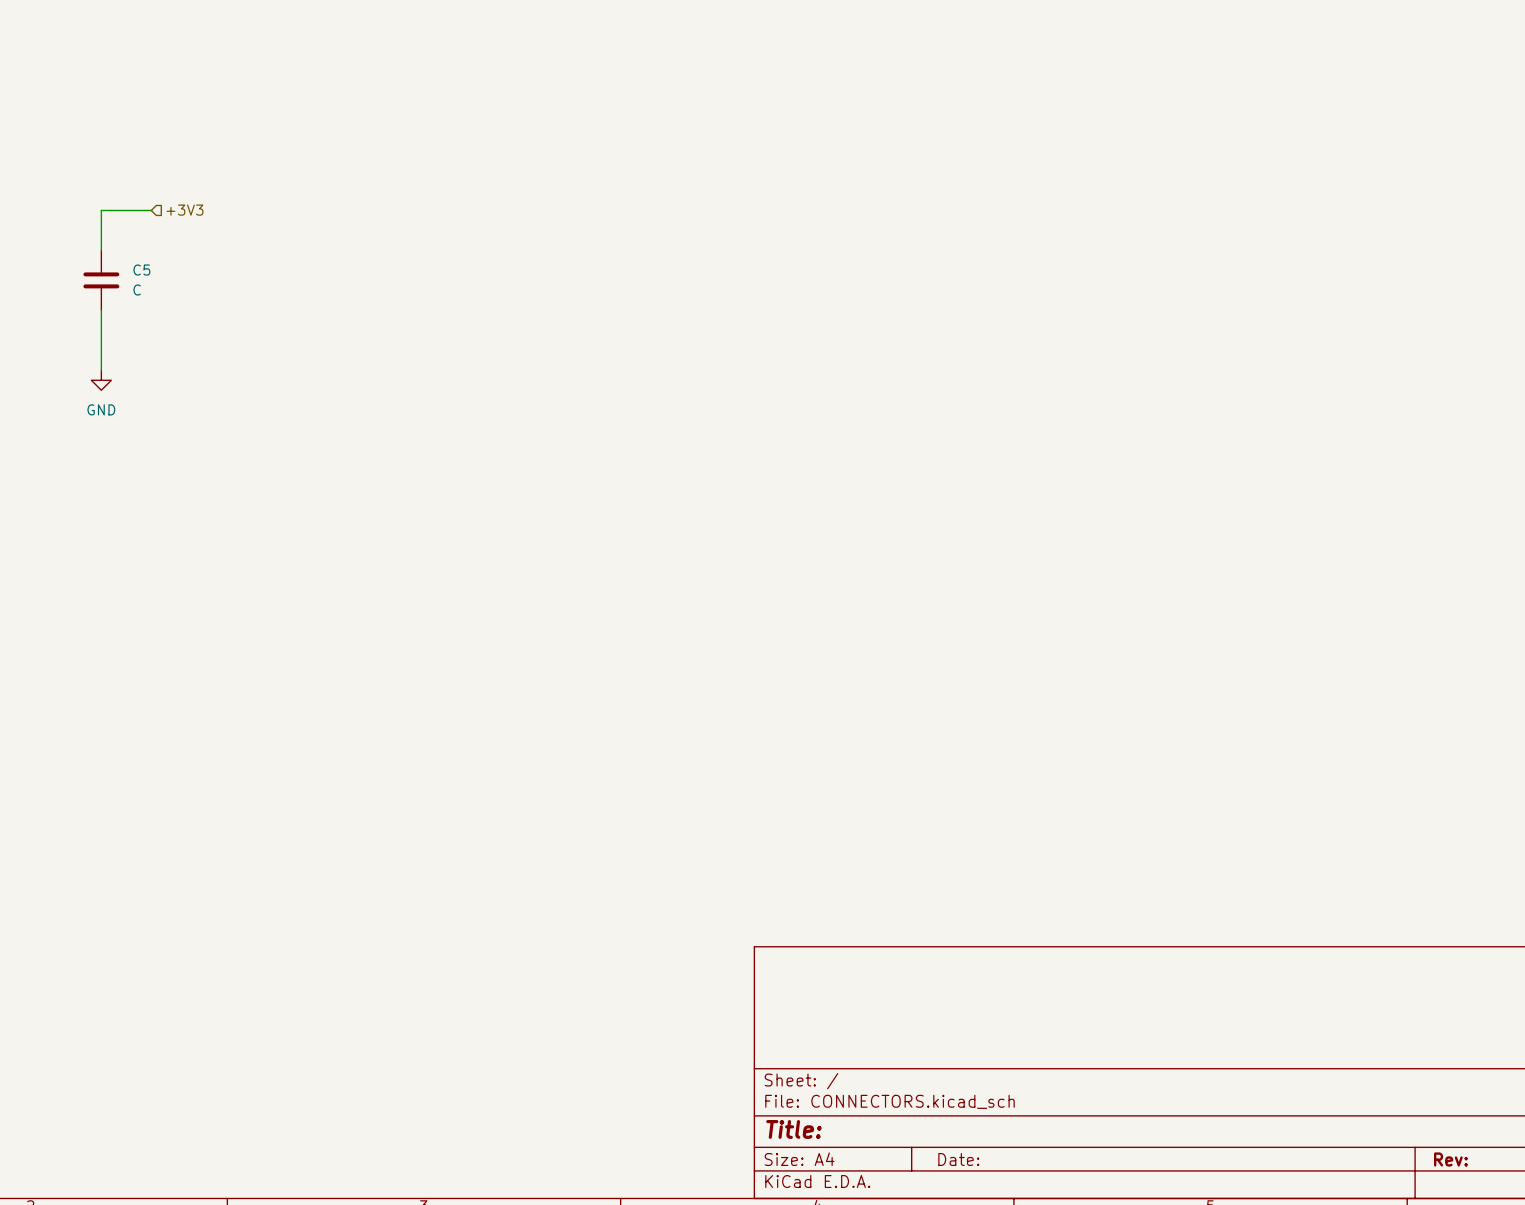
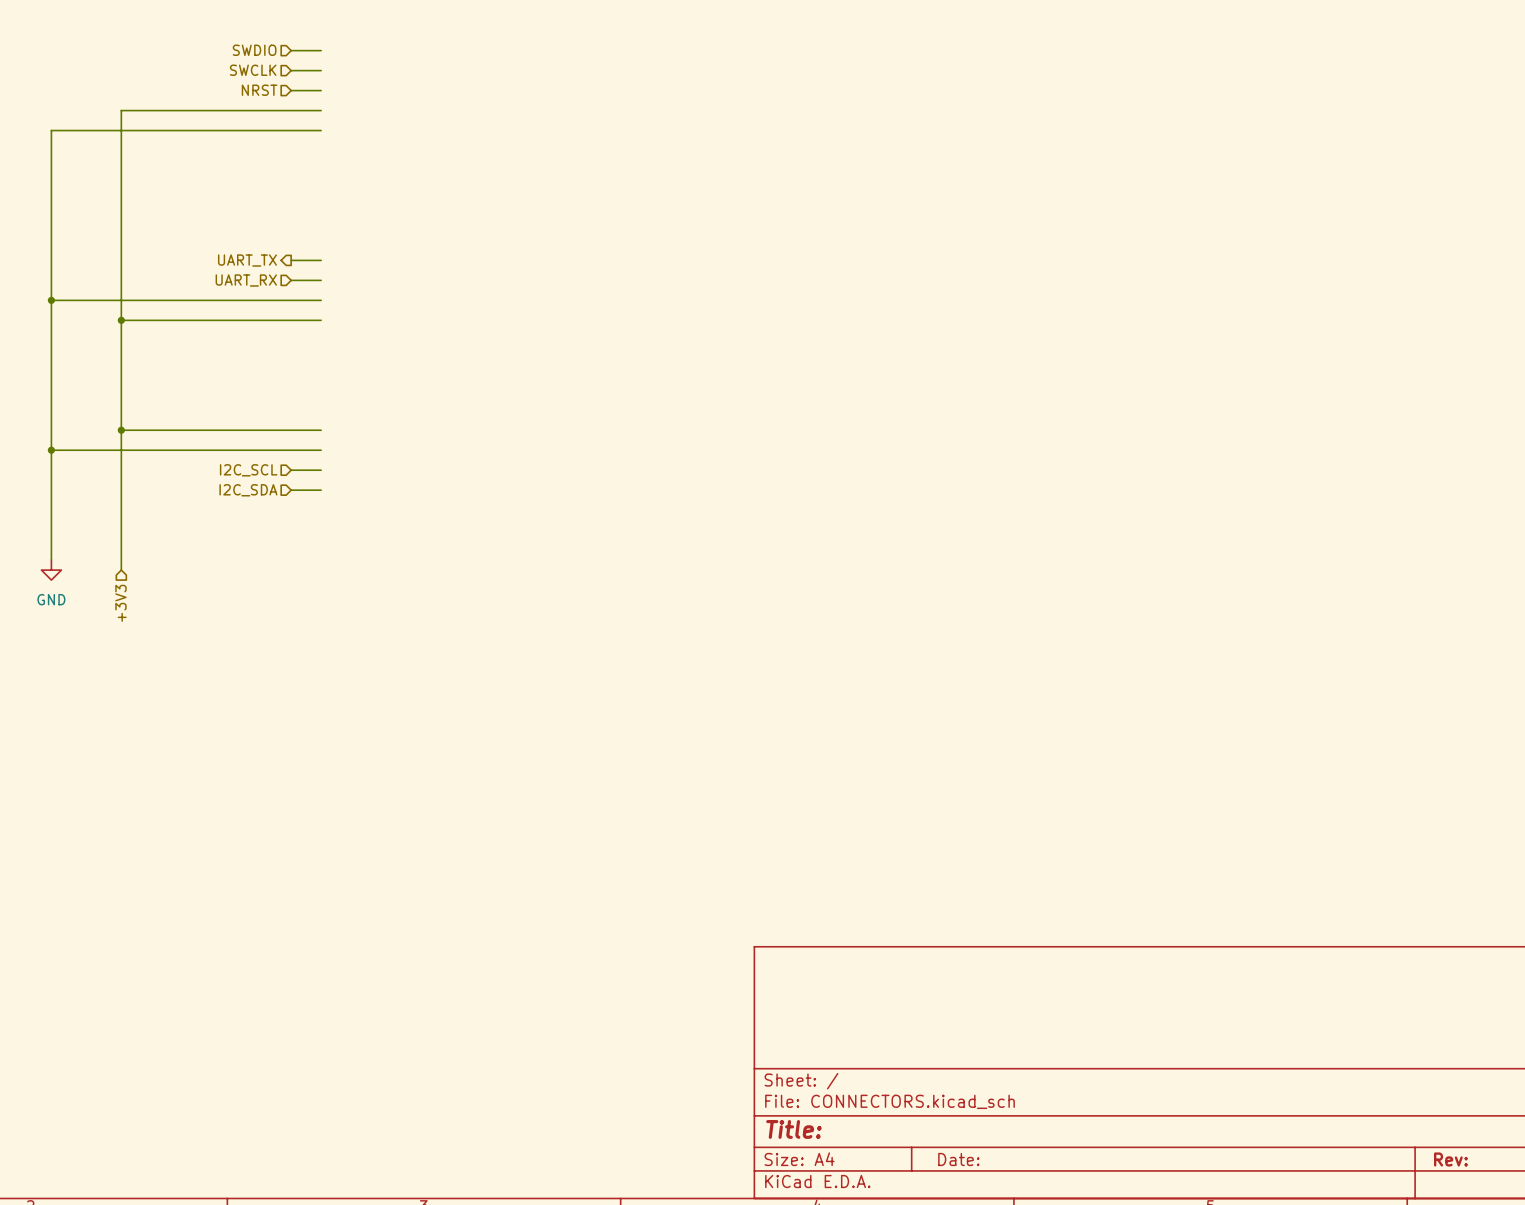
hierarchical label: none -> SWDIO (254, 50)
wire: none -> (291, 50) (321, 50)
hierarchical label: none -> SWCLK (253, 70)
wire: none -> (291, 70) (321, 70)
hierarchical label: none -> NRST (259, 90)
wire: none -> (291, 90) (321, 90)
wire: none -> (321, 110) (121, 110) (121, 570)
wire: none -> (321, 130) (51, 130) (51, 560)
wire: (151, 210) (101, 210) (101, 250) -> none
hierarchical label: +3V3 (185, 210) -> none
hierarchical label: none -> UART_TX (247, 260)
wire: none -> (291, 260) (321, 260)
C5: C (101, 280) -> none
hierarchical label: none -> UART_RX (246, 280)
wire: none -> (291, 280) (321, 280)
wire: none -> (51, 300) (321, 300)
junction: none -> (51, 300)
wire: (101, 310) (101, 370) -> none
wire: none -> (121, 320) (321, 320)
junction: none -> (121, 320)
power symbol position: GND (101, 380) -> GND (51, 570)
wire: none -> (121, 430) (321, 430)
junction: none -> (121, 430)
wire: none -> (51, 450) (321, 450)
junction: none -> (51, 450)
hierarchical label: none -> I2C_SCL (248, 470)
wire: none -> (291, 470) (321, 470)
hierarchical label: none -> I2C_SDA (248, 490)
wire: none -> (291, 490) (321, 490)
hierarchical label: none -> +3V3 (120, 603)

